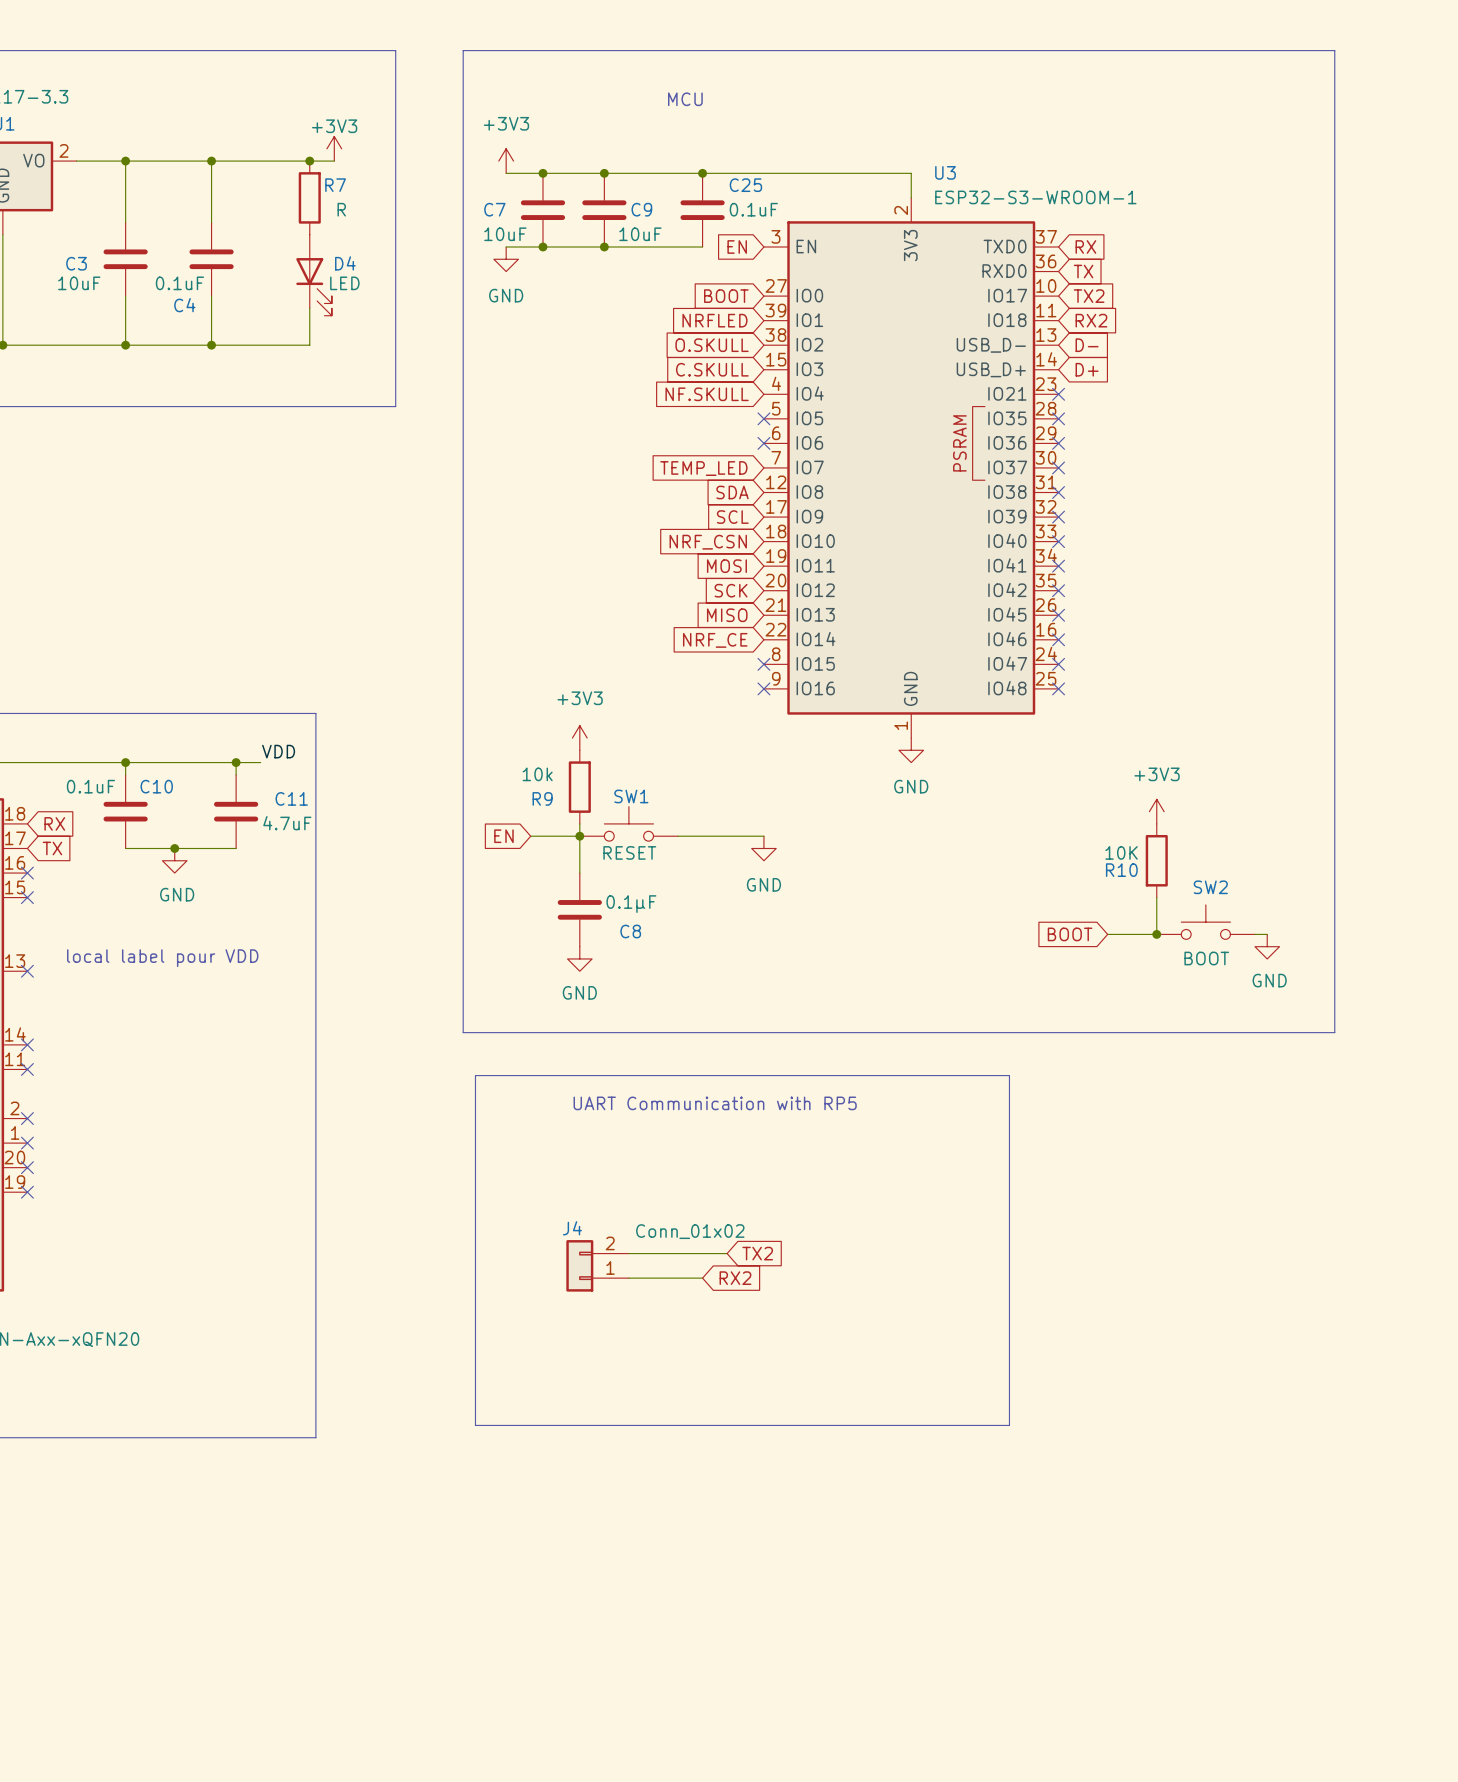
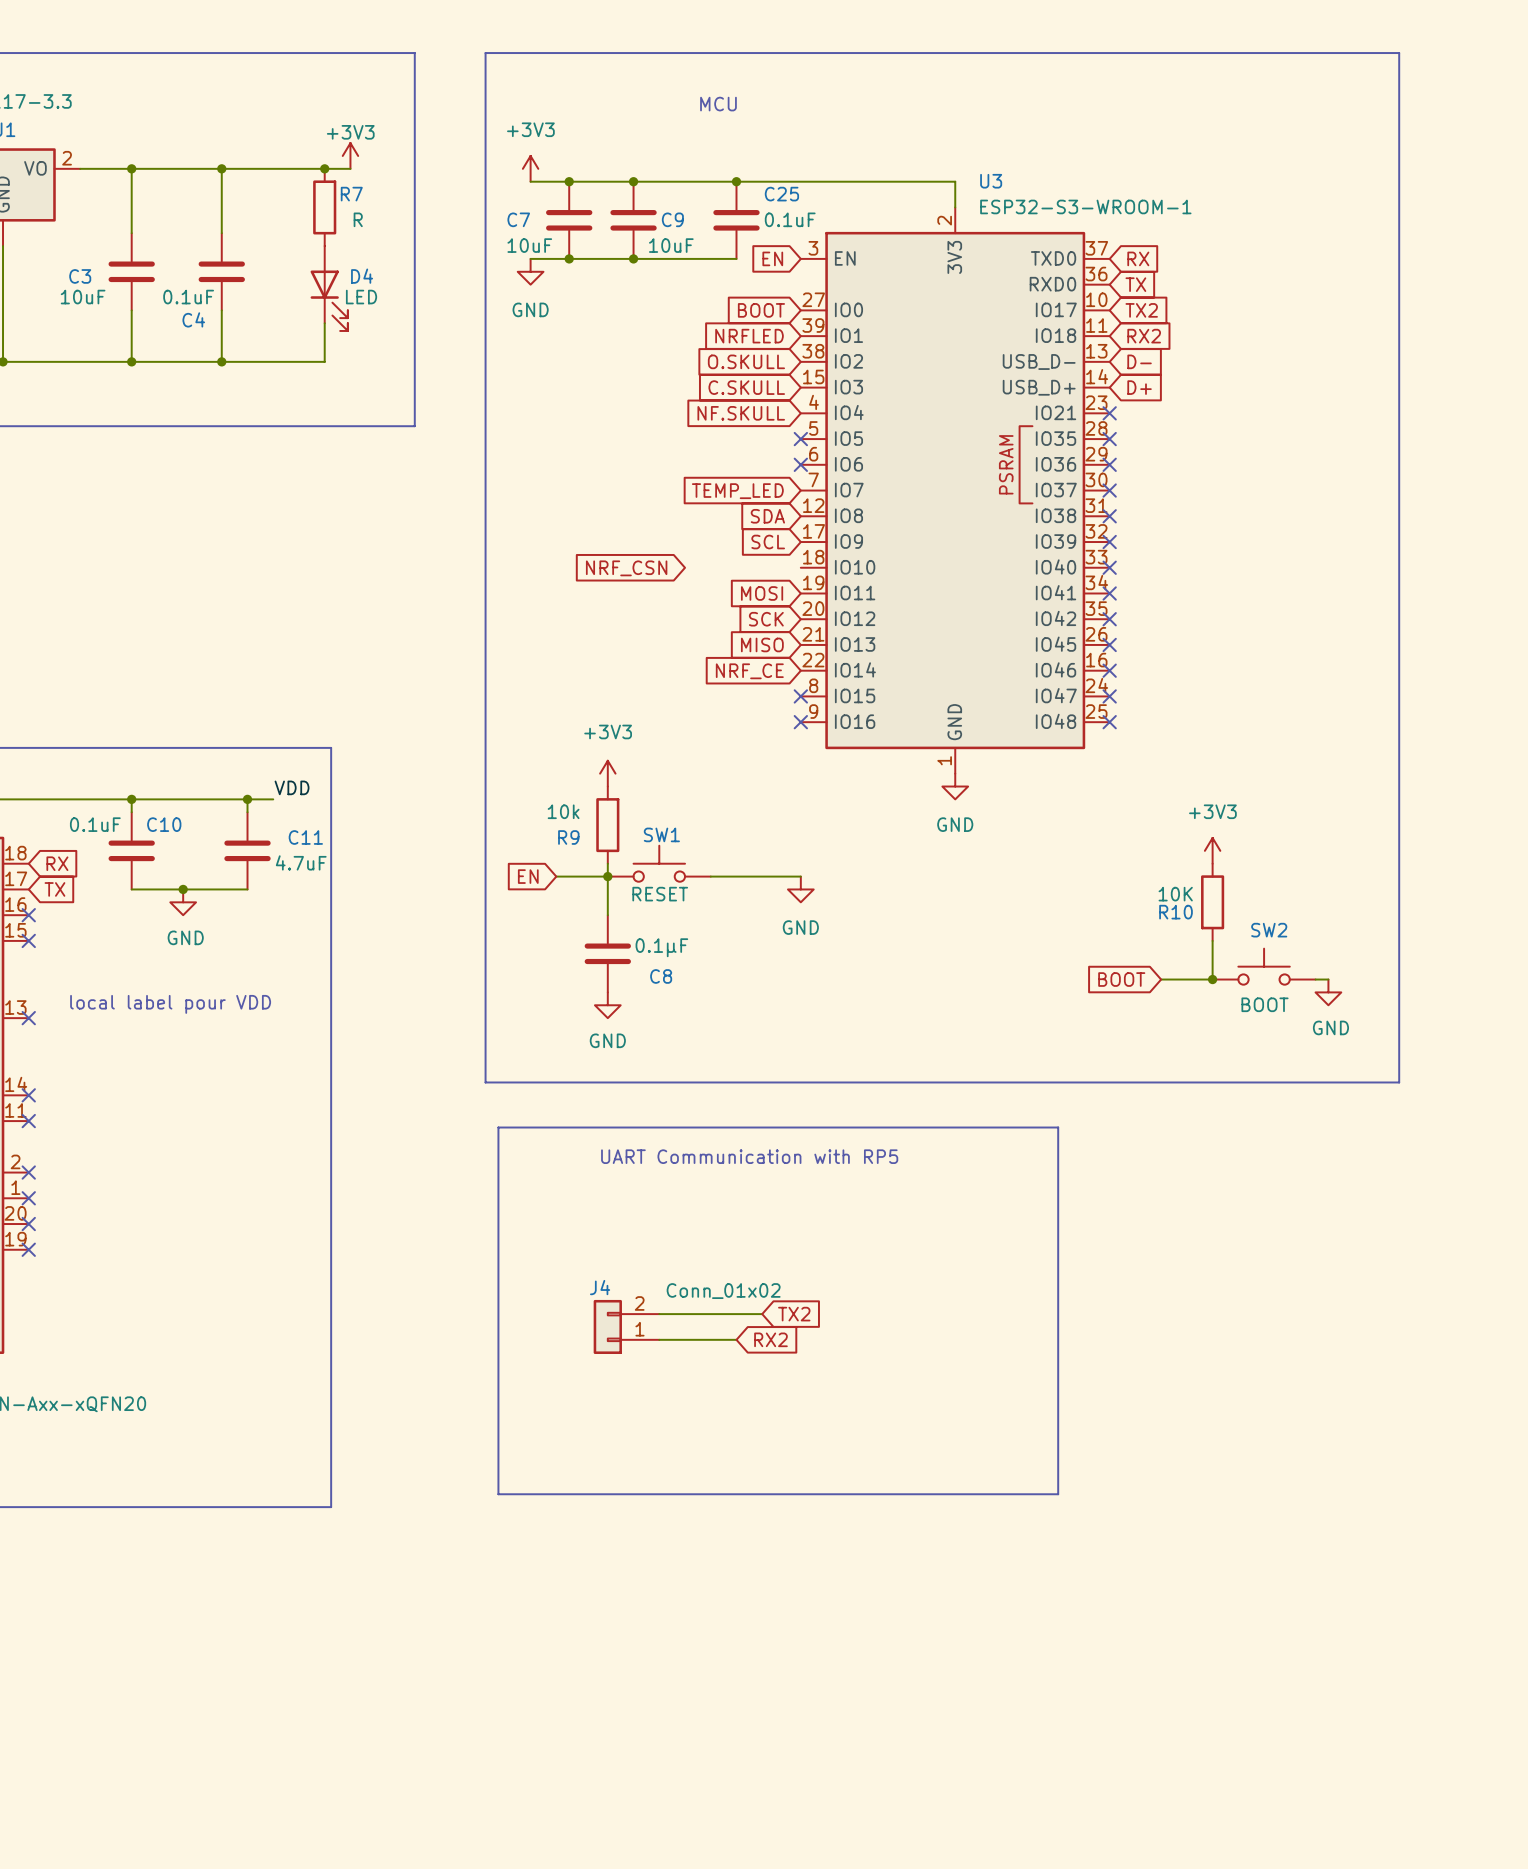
global label position: NRF_CSN (708, 542) -> NRF_CSN (626, 568)

